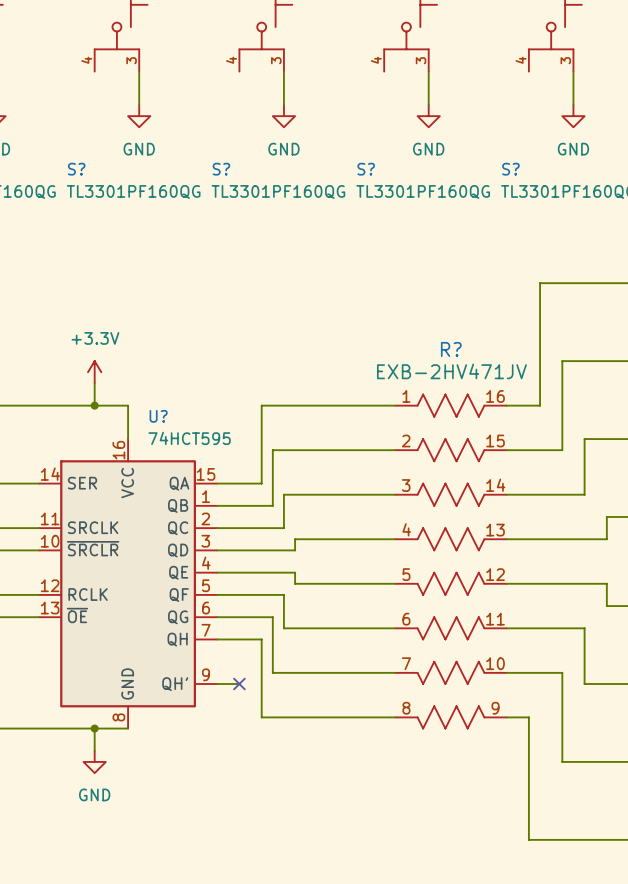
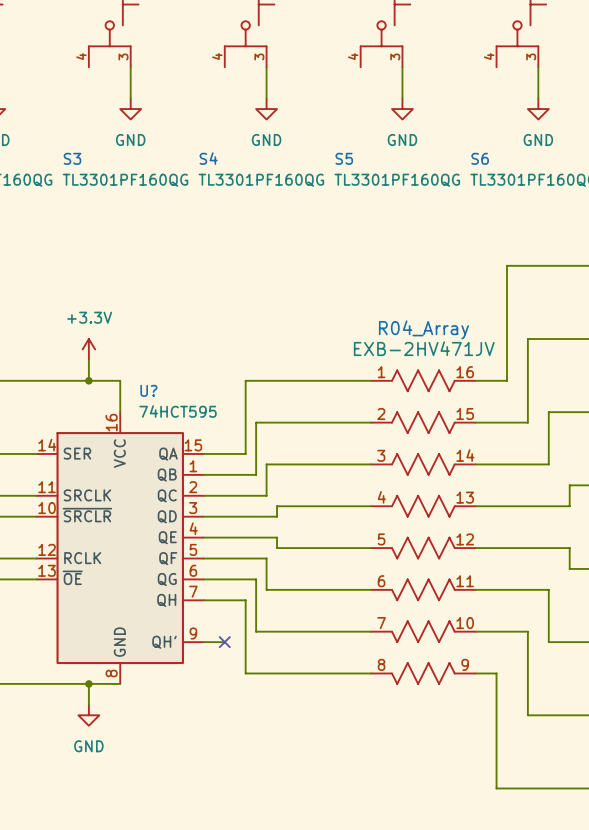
S? name: S? (76, 169) -> S3 (72, 158)
S? name: S? (221, 169) -> S4 (208, 158)
S? name: S? (366, 169) -> S5 (344, 158)
S? name: S? (510, 169) -> S6 (480, 158)
R? name: R? (451, 349) -> R04_Array (423, 329)

